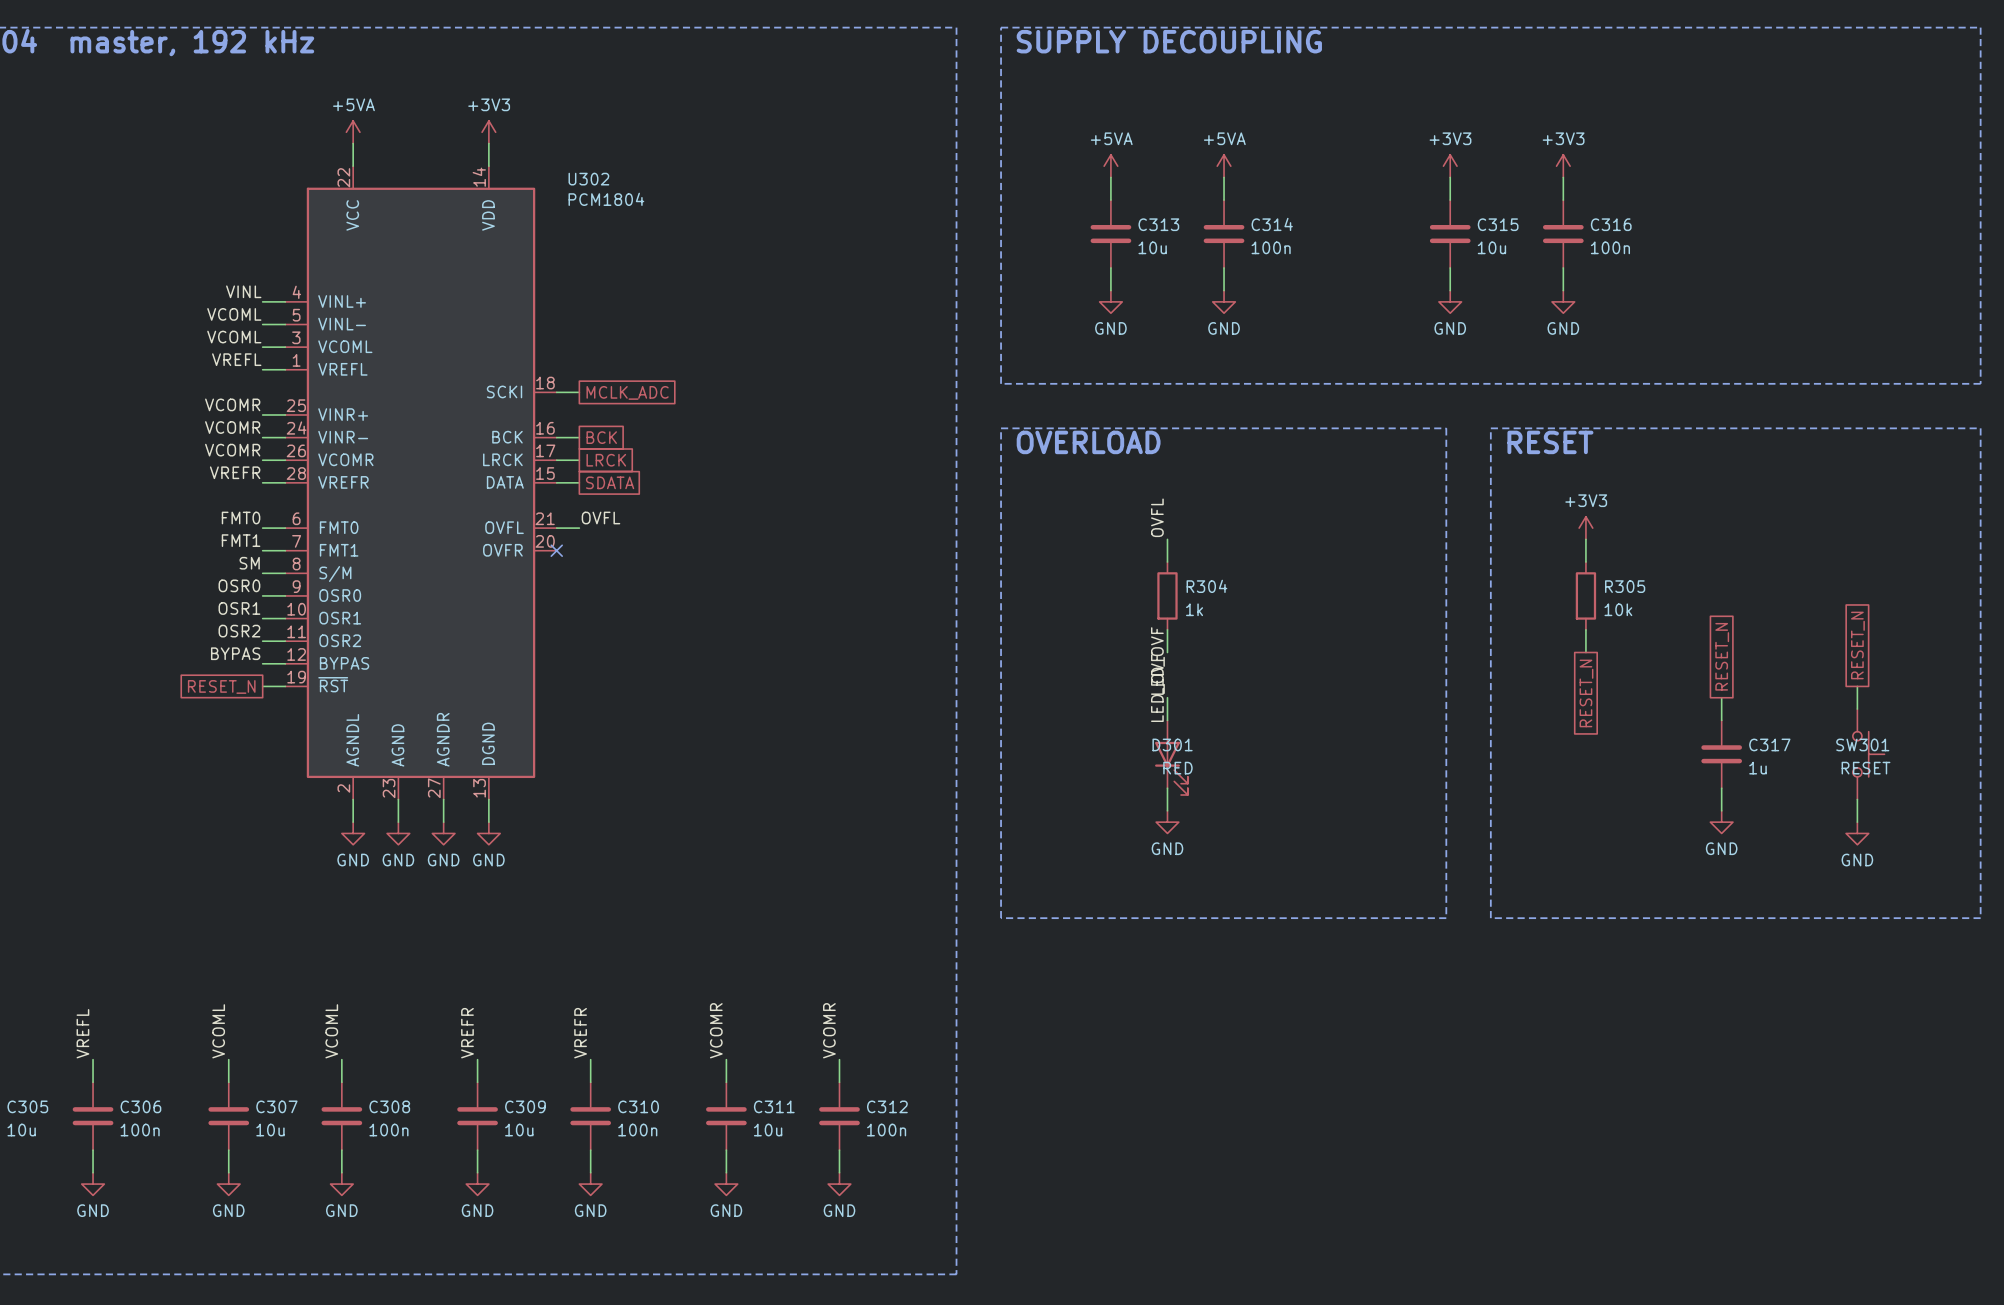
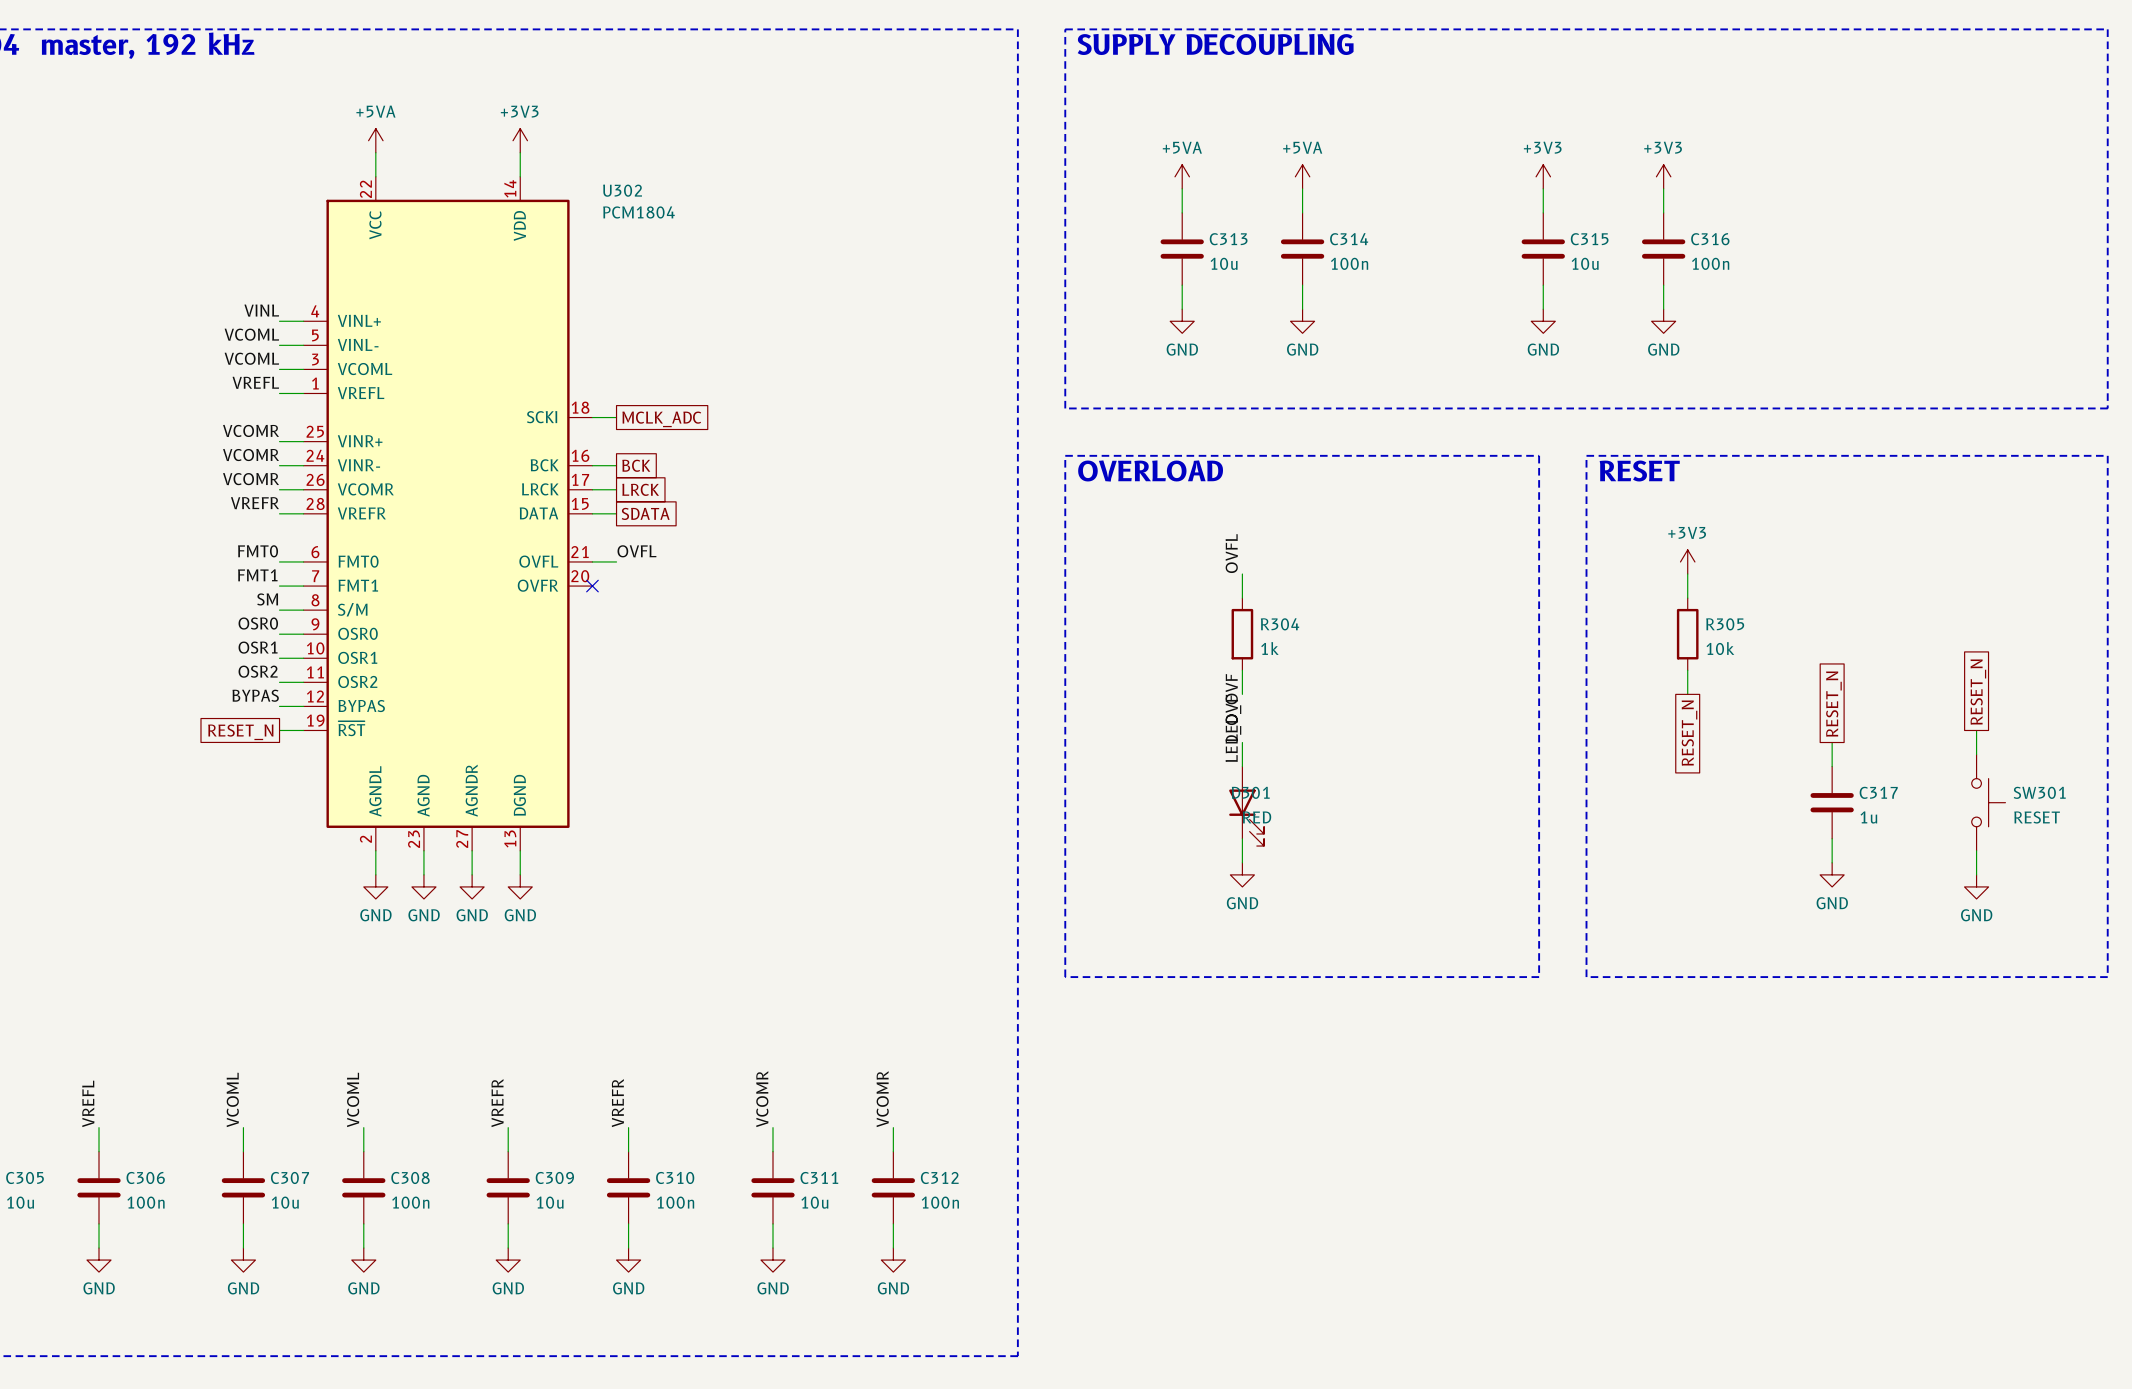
SW301 name position: SW301 (1862, 744) -> SW301 (2039, 792)
SW301 value position: RESET (1866, 768) -> RESET (2037, 817)

